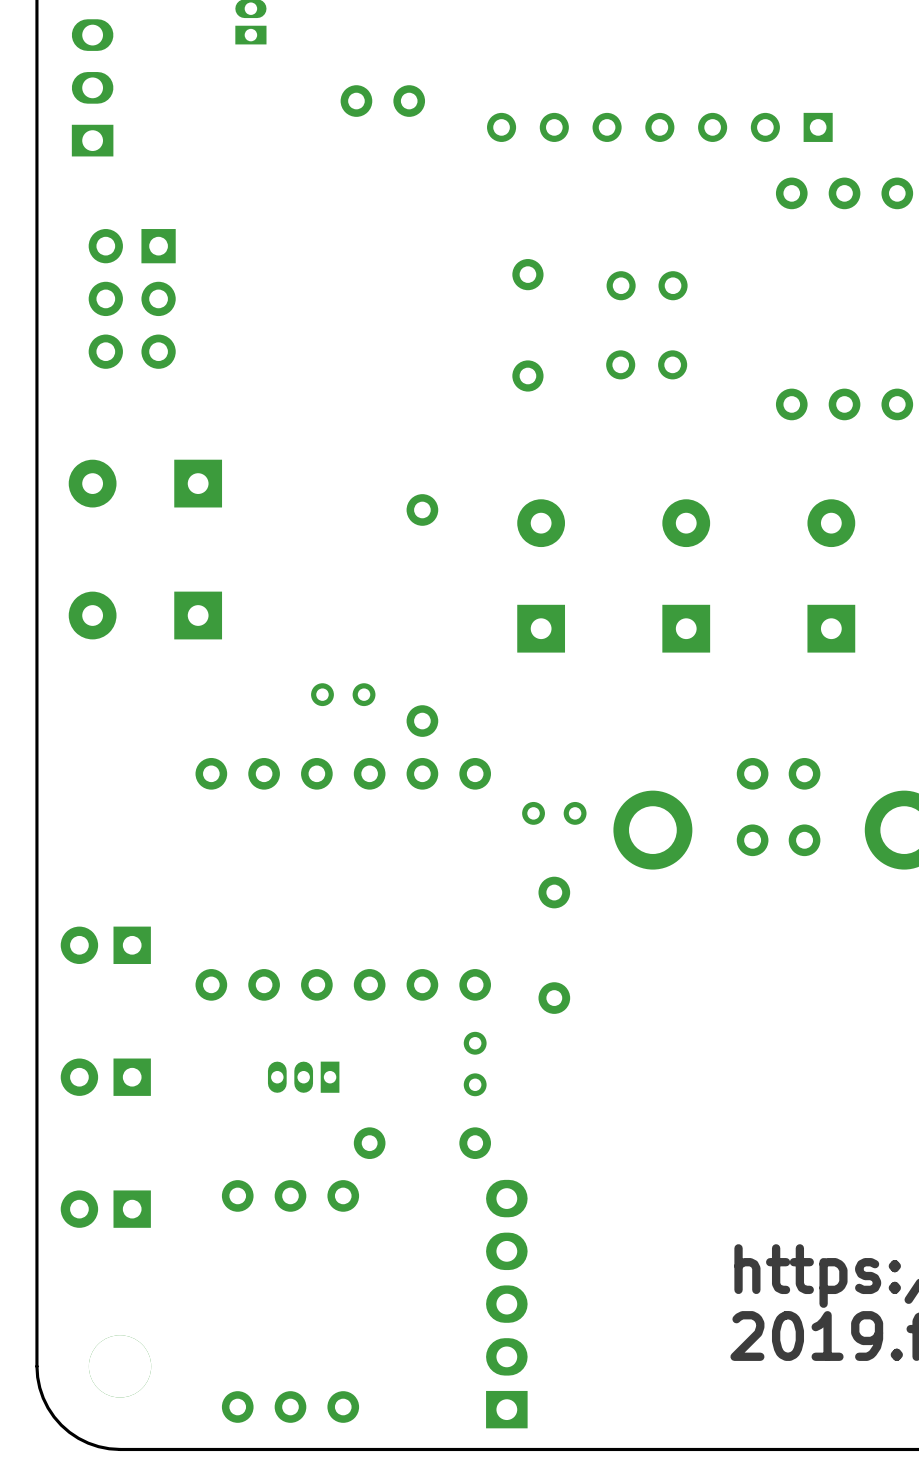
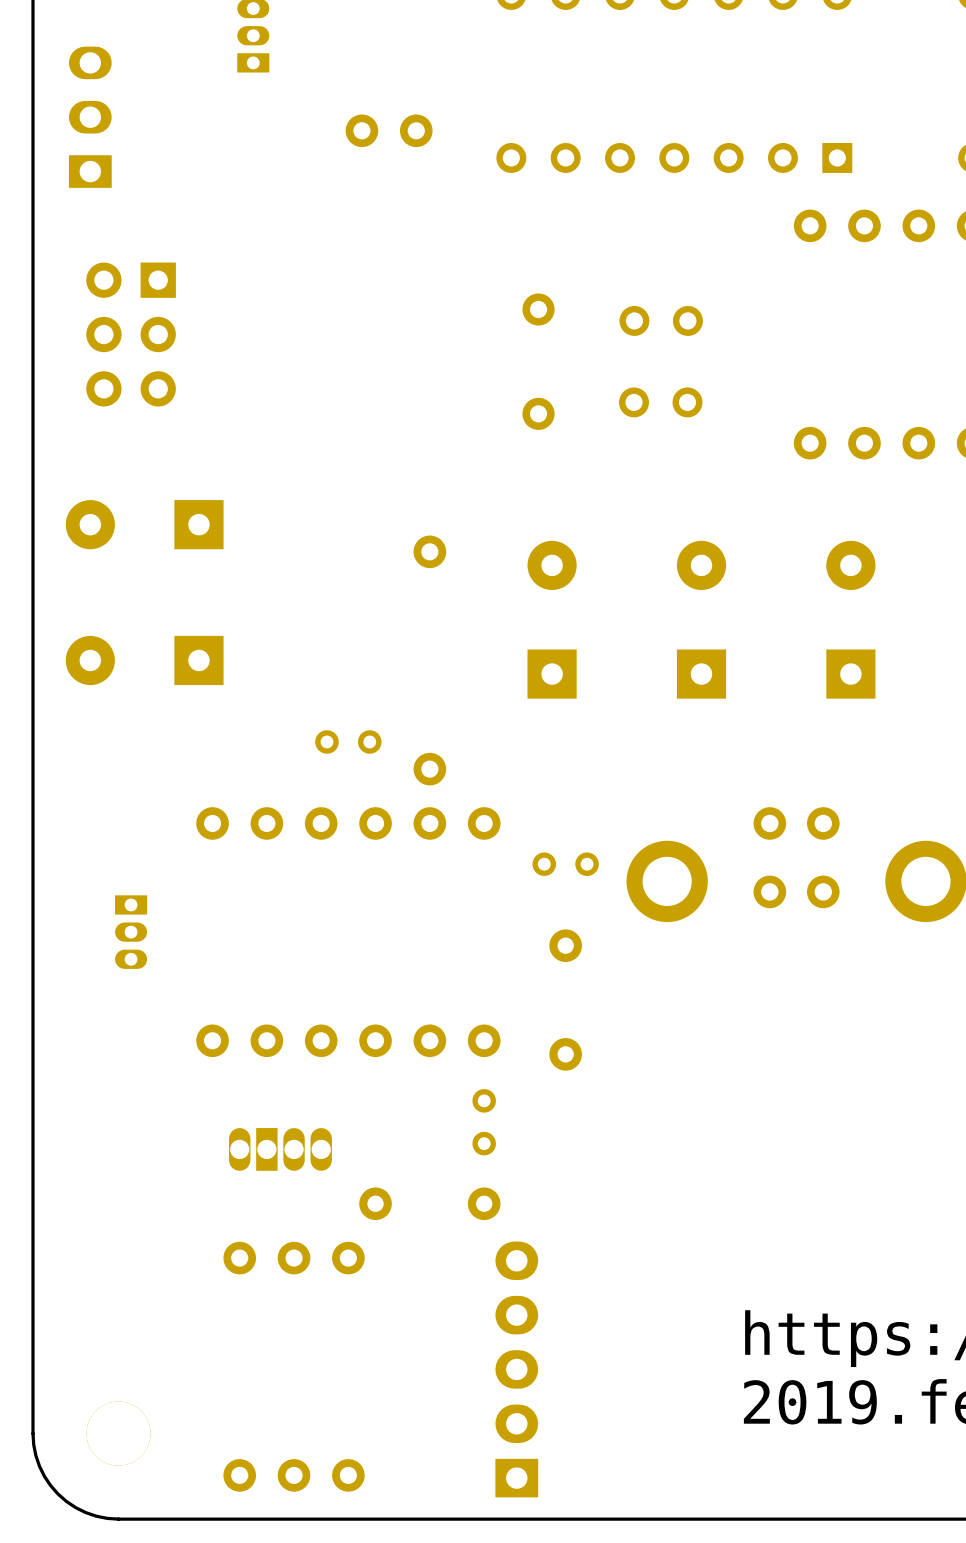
part: (105, 945) -> none
part: (105, 1077) -> none
part rotation: 0° (303, 1077) -> 90° counterclockwise (131, 932)
part position: (303, 1077) -> (131, 932)
part: none -> (280, 1149)
part: (105, 1209) -> none

